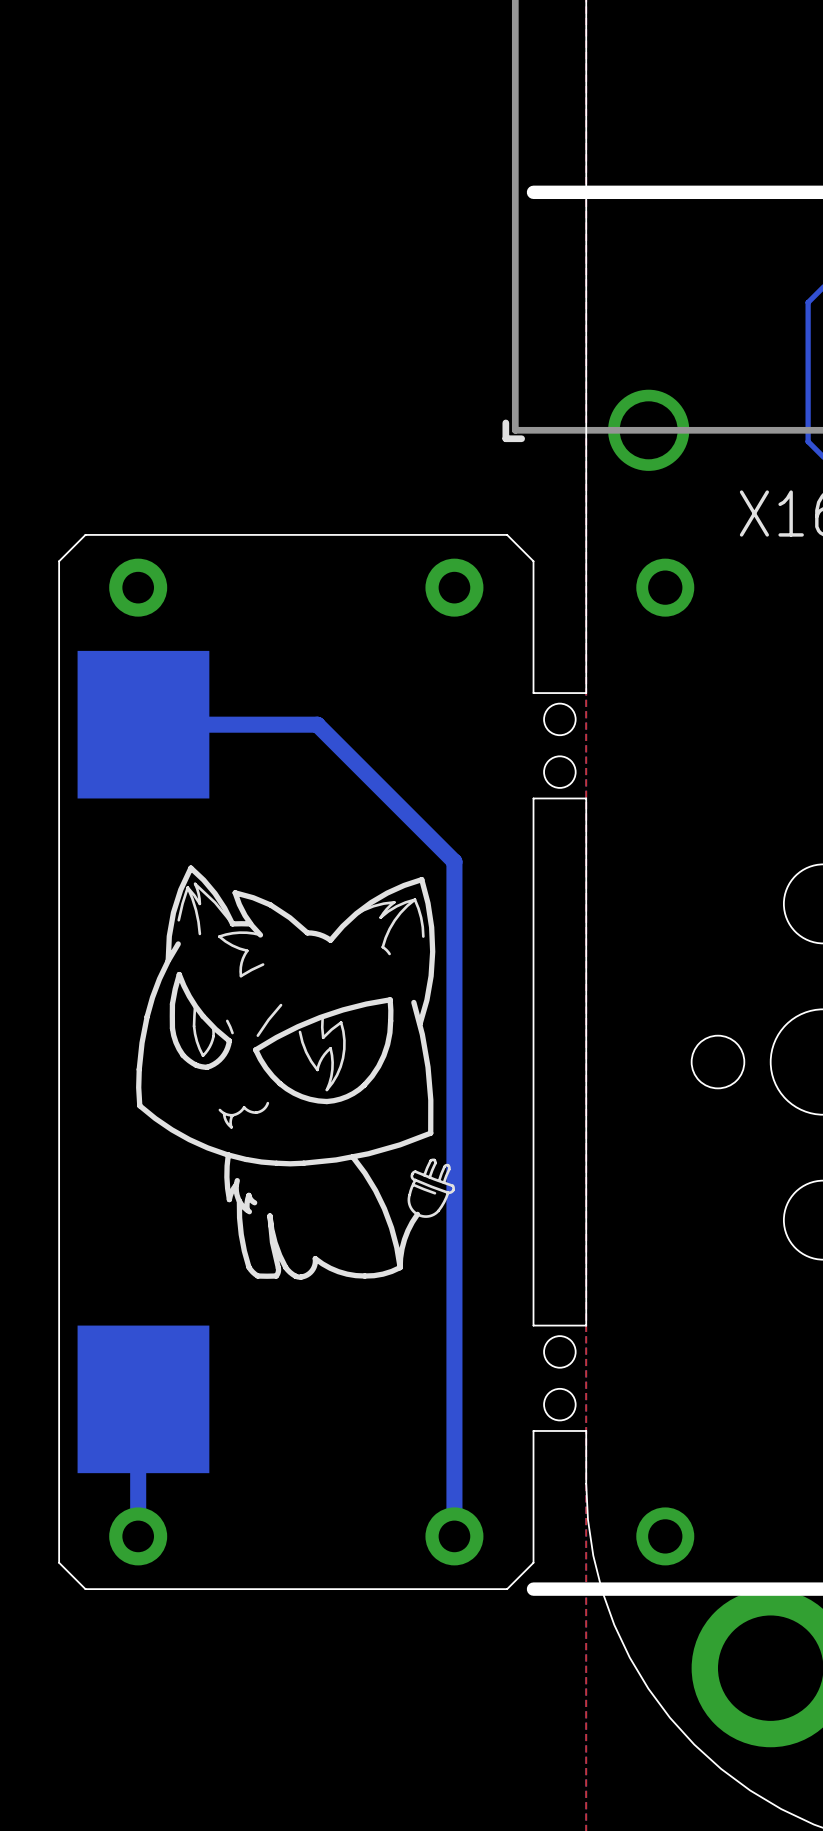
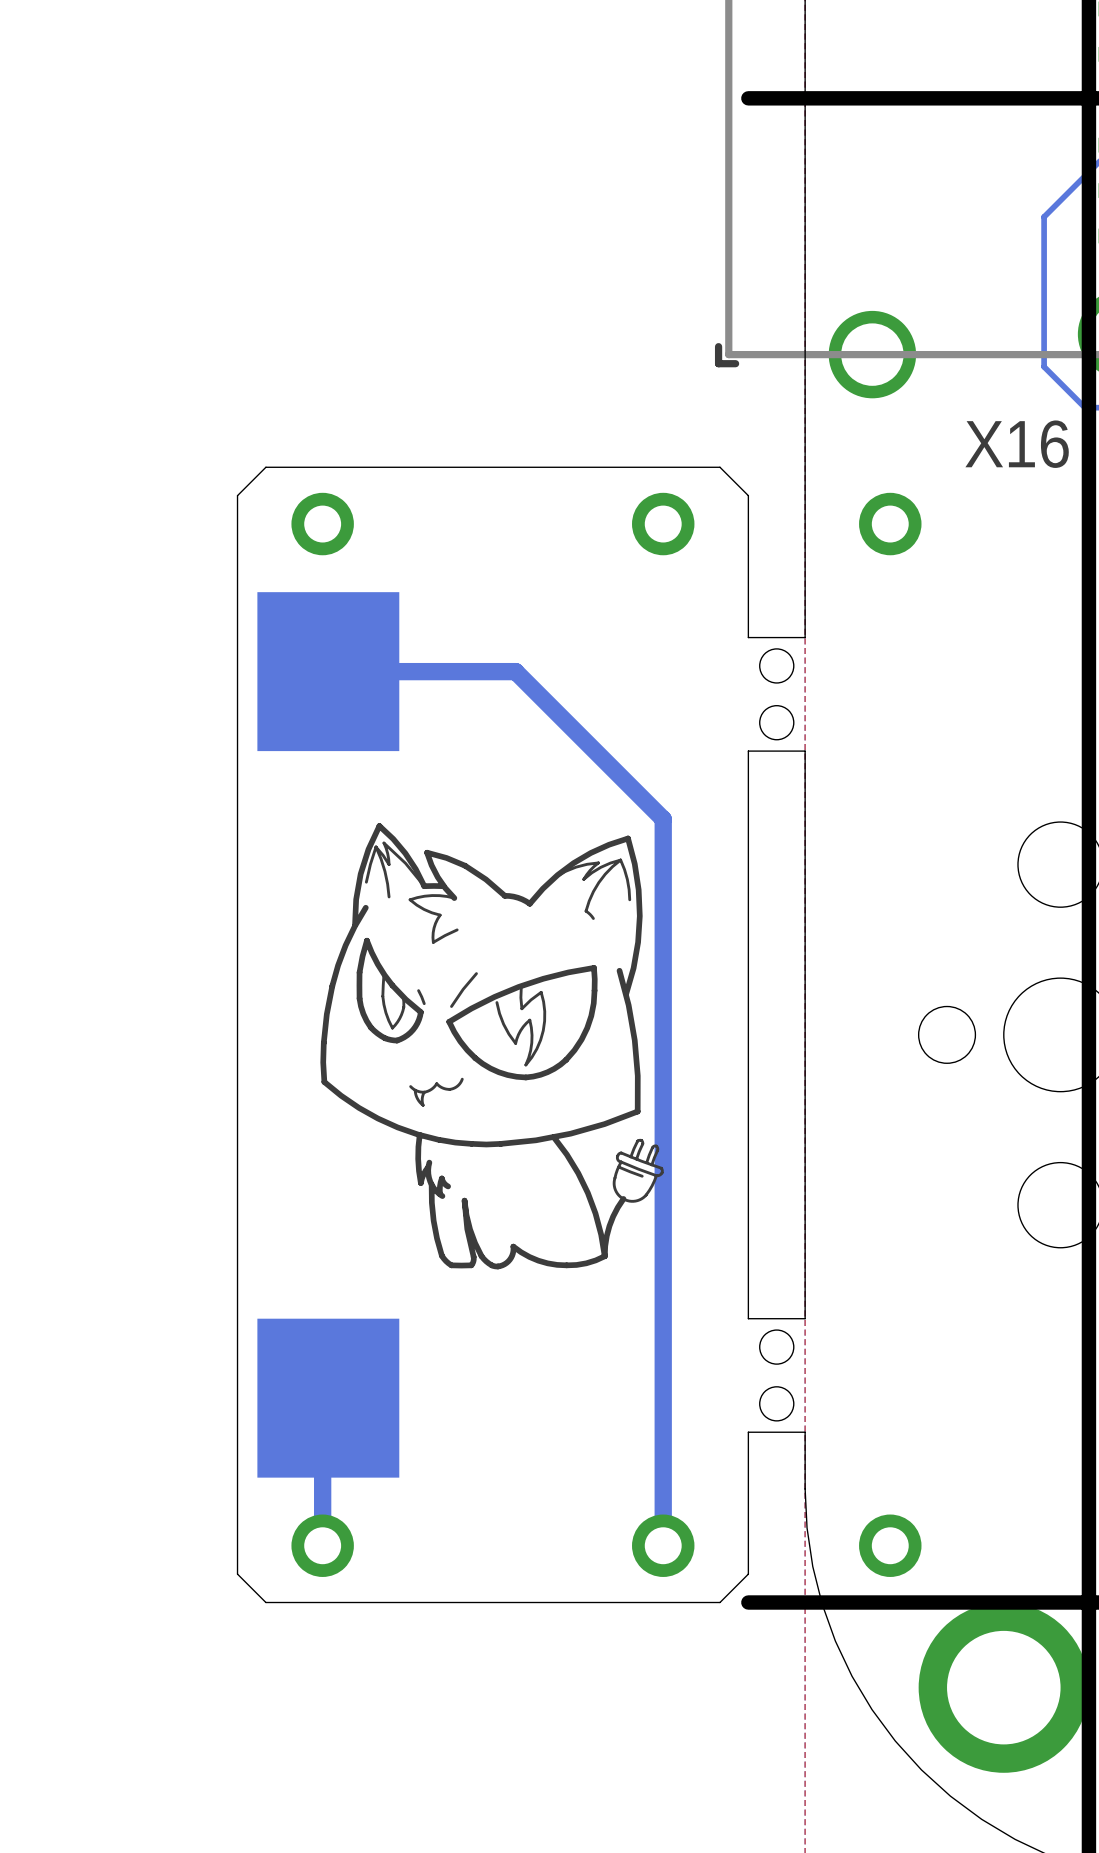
via: (138, 587) -> none
part: none -> (322, 524)
via: (454, 587) -> none
part: none -> (663, 524)
via: (138, 1536) -> none
part: none -> (322, 1545)
via: (454, 1536) -> none
part: none -> (663, 1545)

